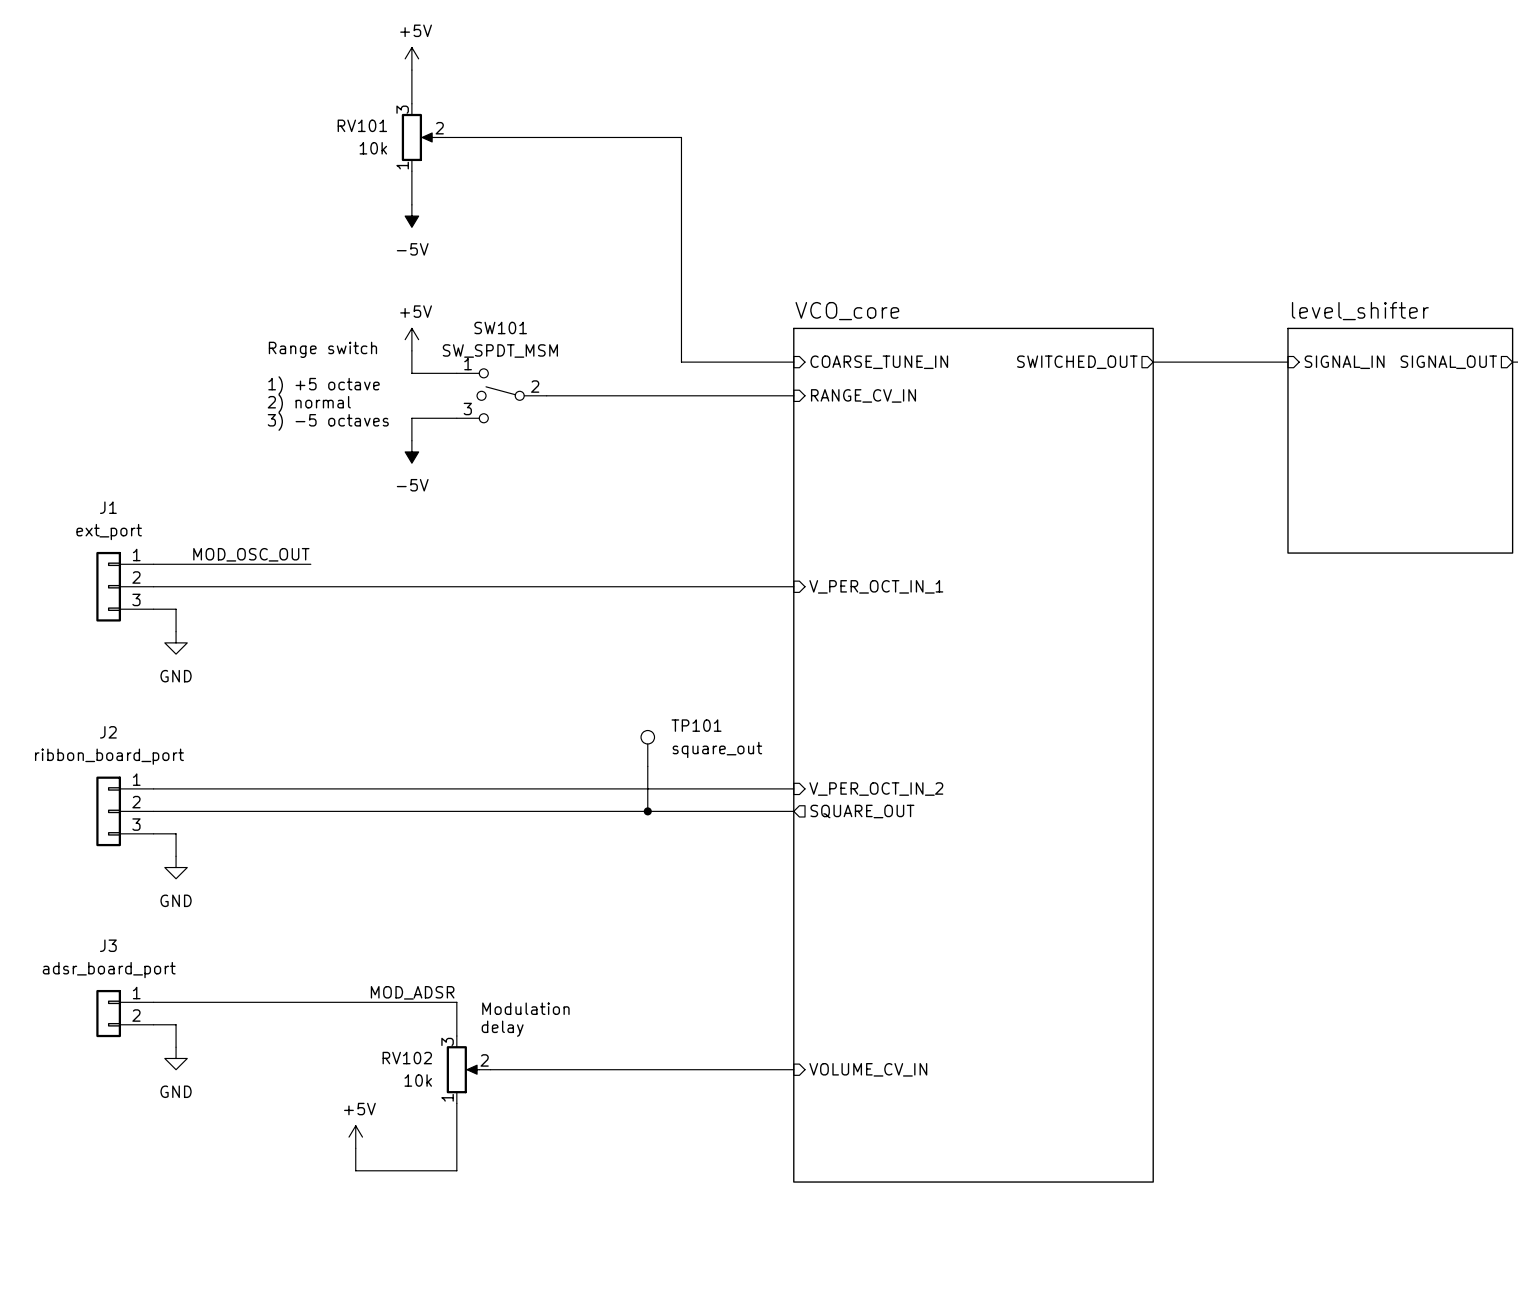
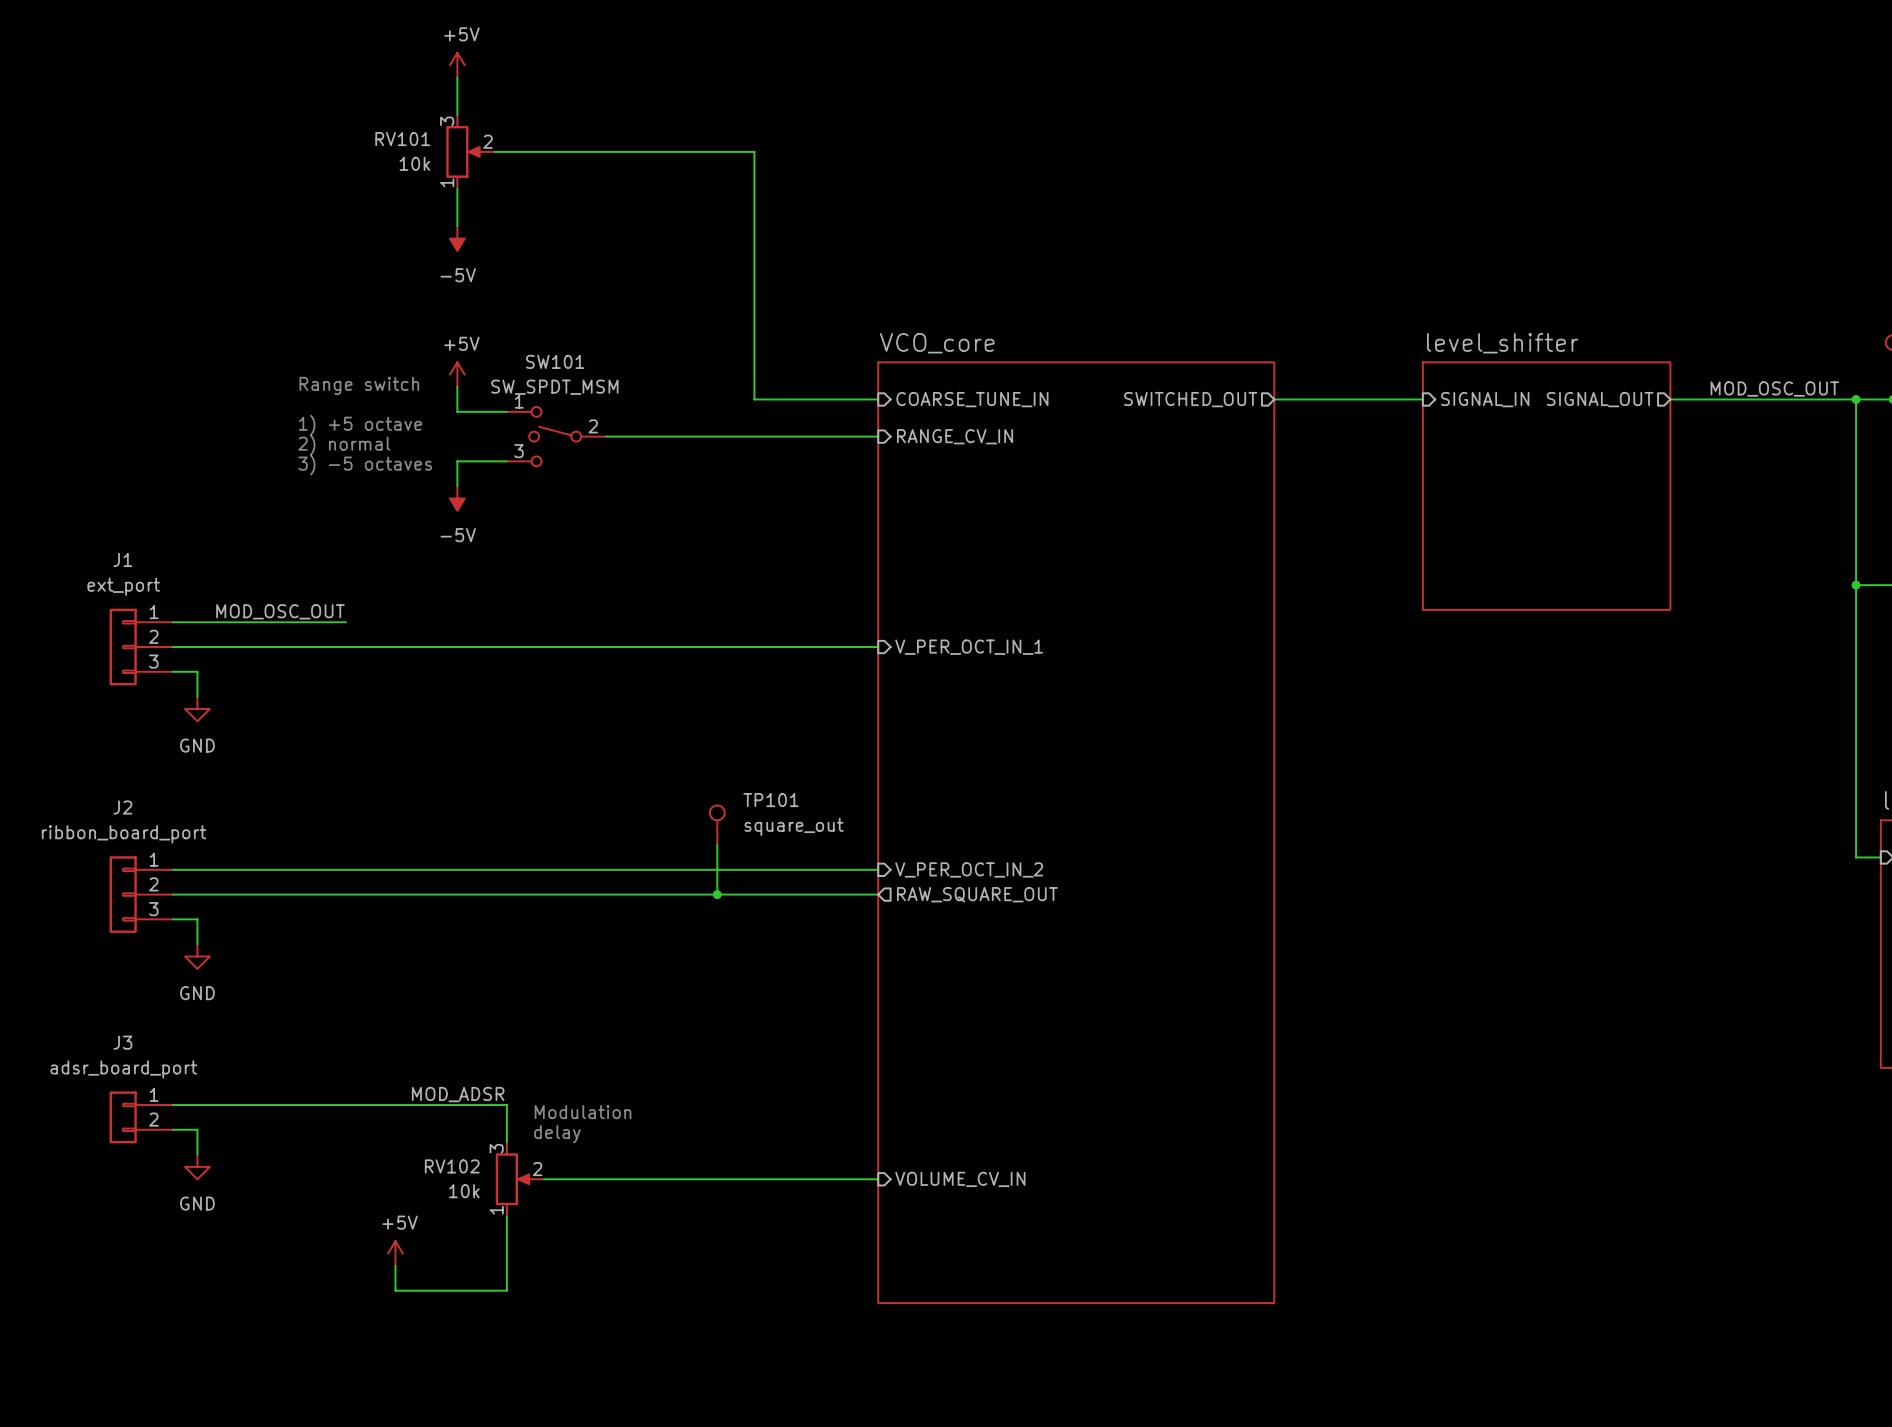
sheet pin: SQUARE_OUT (862, 811) -> RAW_SQUARE_OUT (977, 894)

